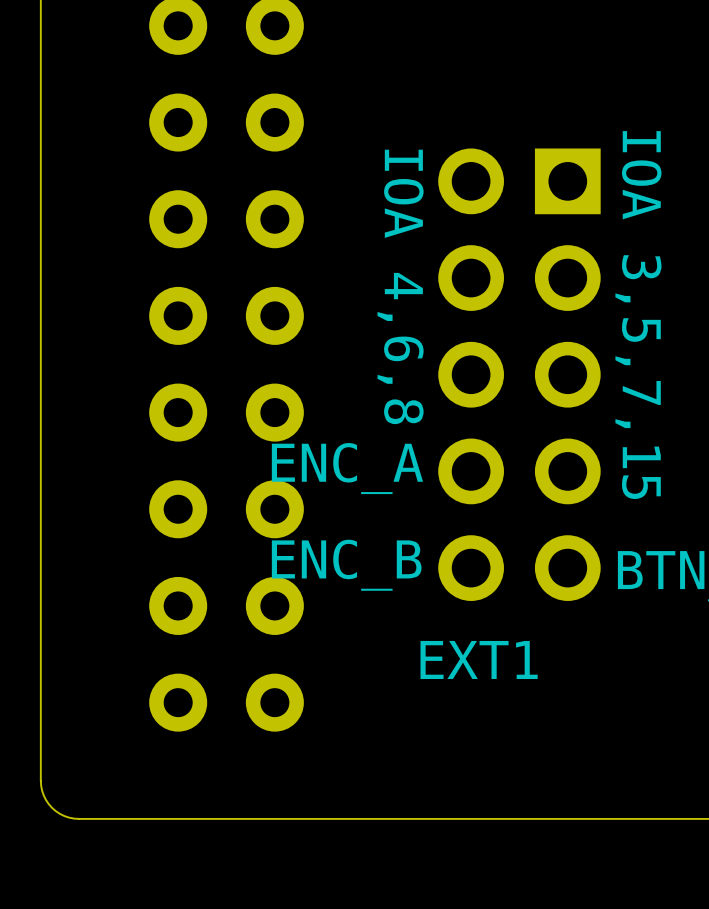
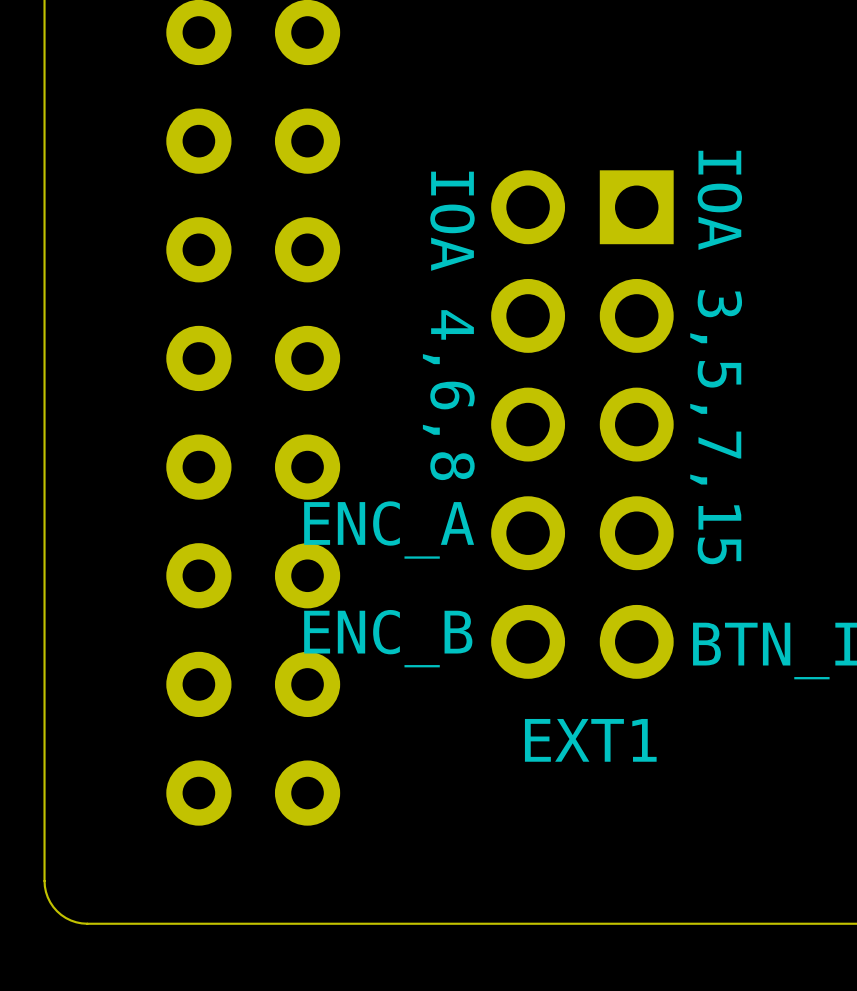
text position: EXT1 (479, 659) -> EXT1 (590, 740)

